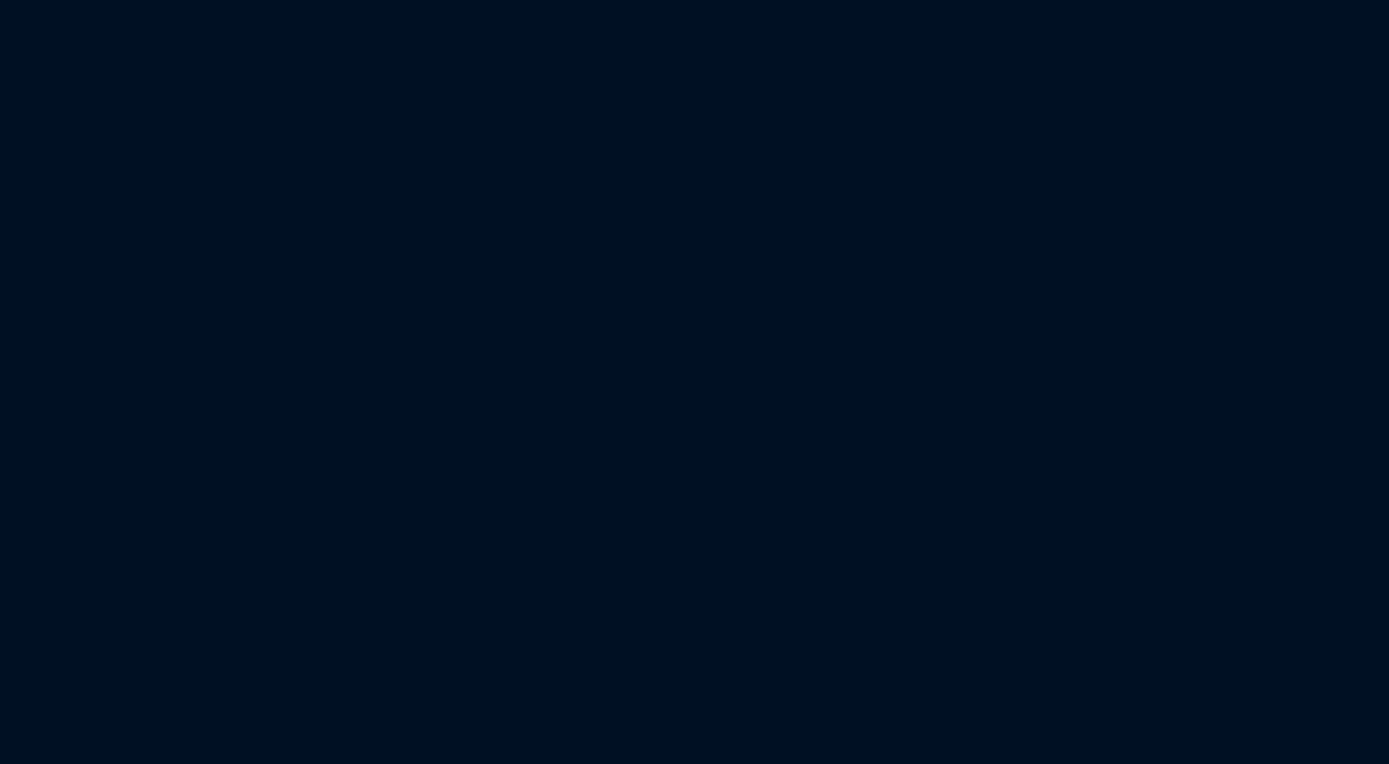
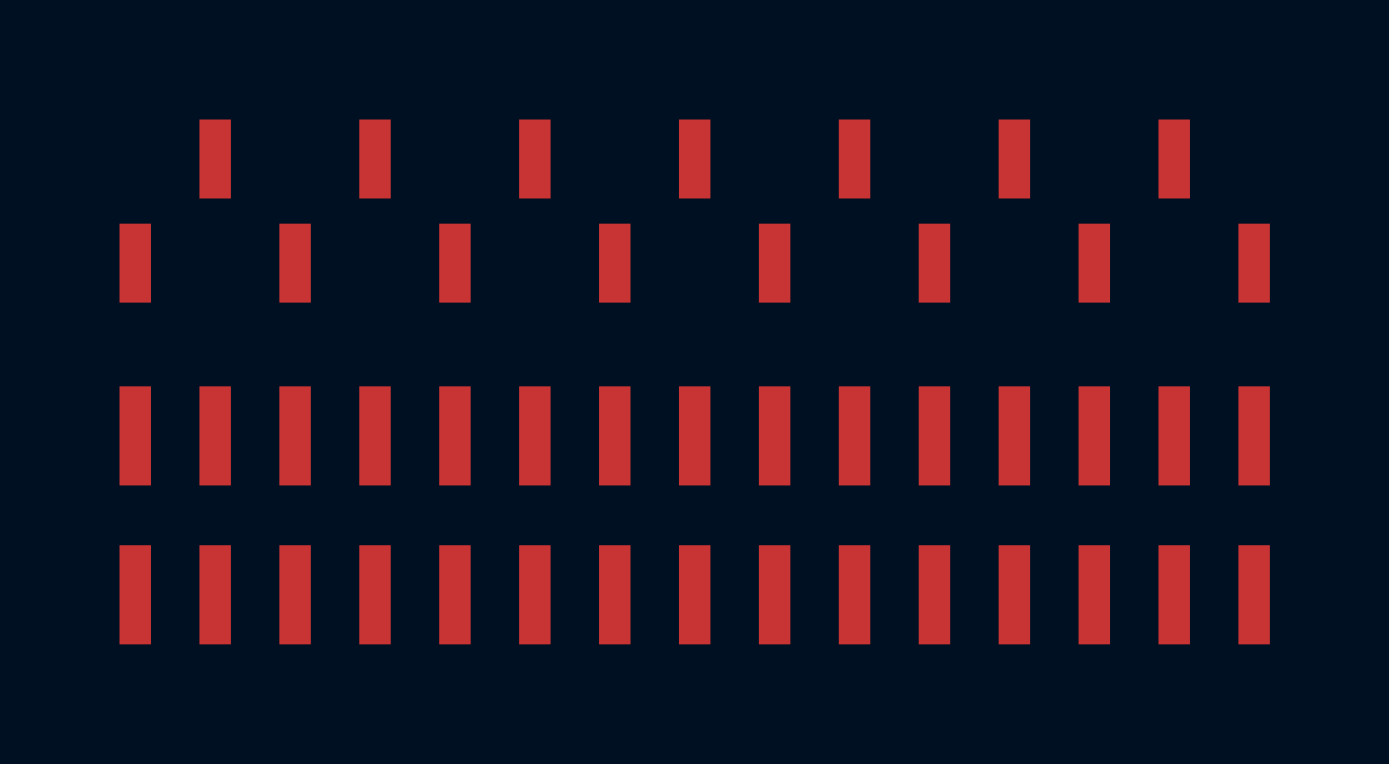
part: none -> (694, 211)
part: none -> (694, 515)

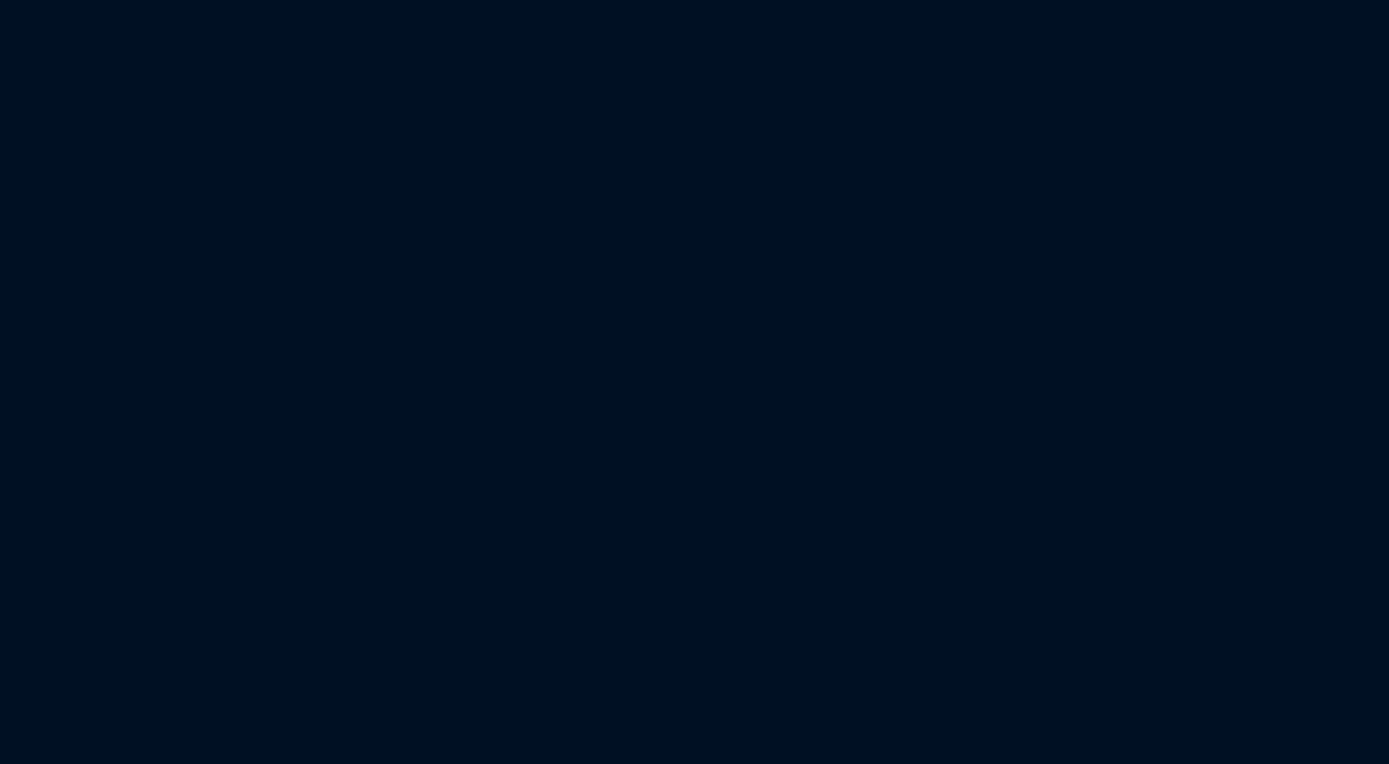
part: (694, 211) -> none
part: (694, 515) -> none

